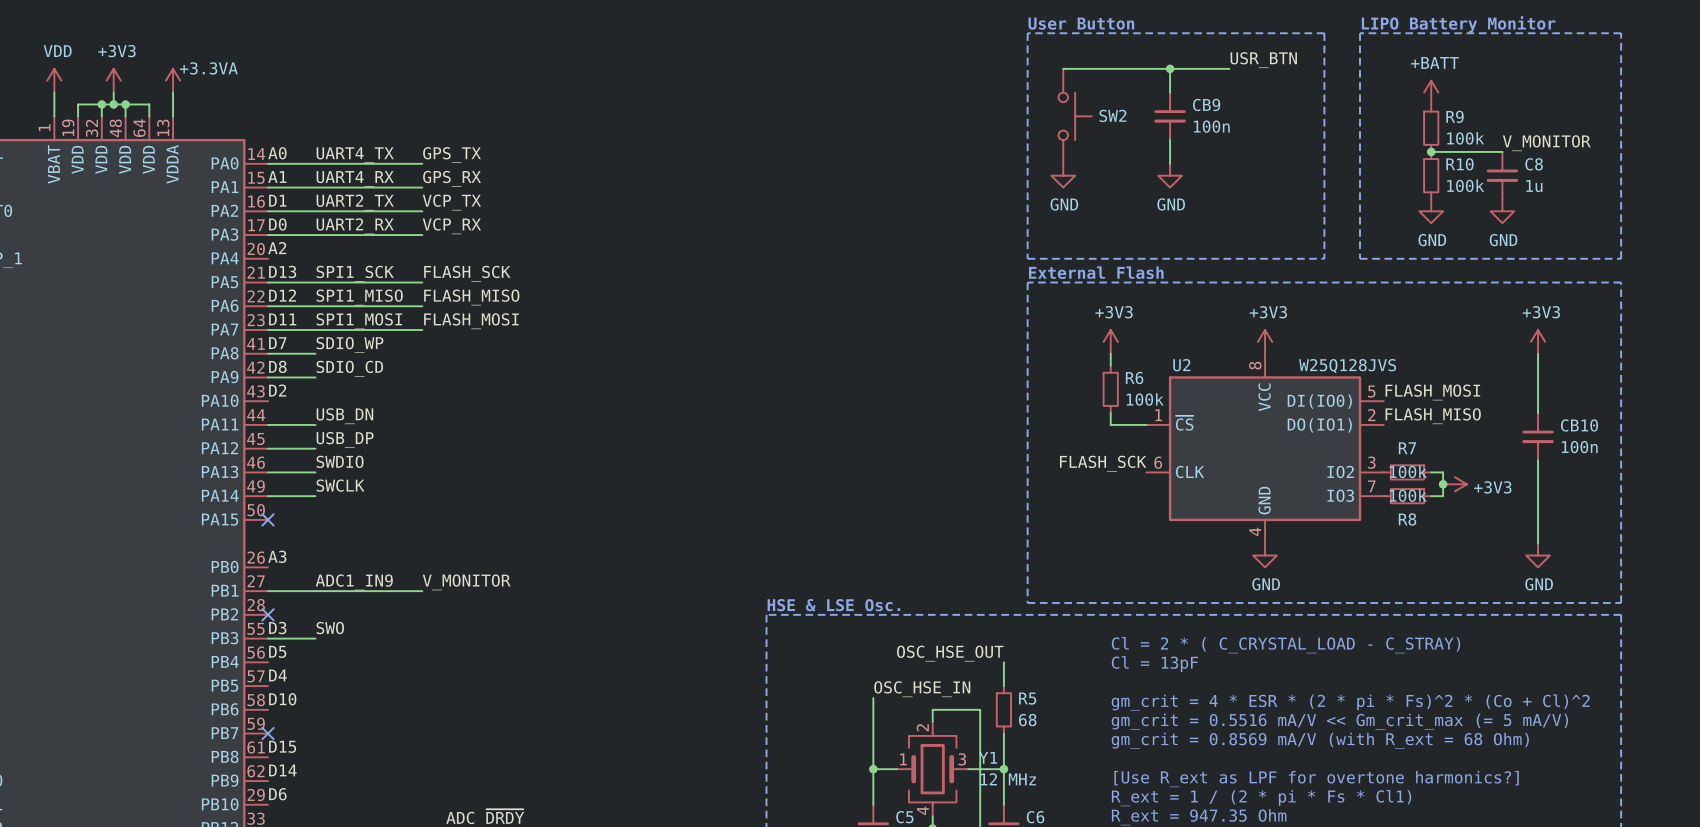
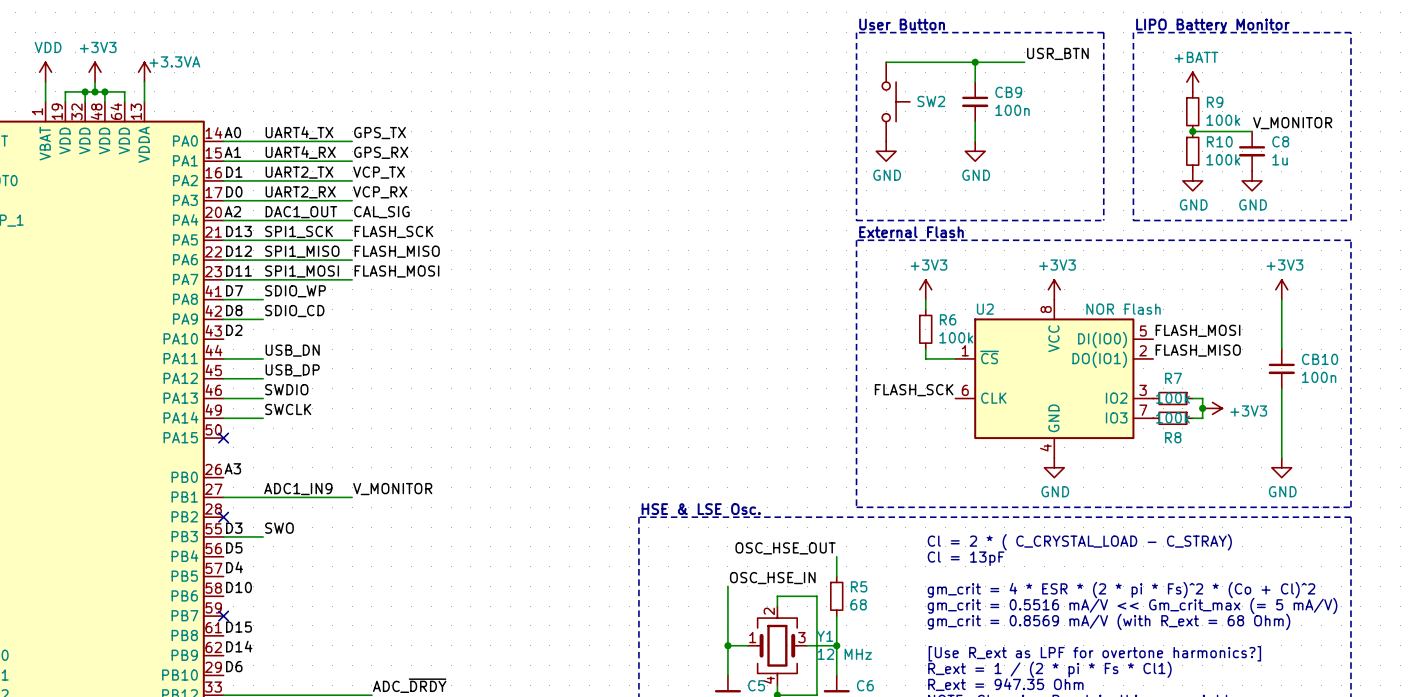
label: none -> DAC1_OUT (301, 212)
label: none -> CAL_SIG (381, 212)
wire: none -> (223, 220) (352, 220)
U2 value: W25Q128JVS (1347, 366) -> NOR Flash (1123, 309)

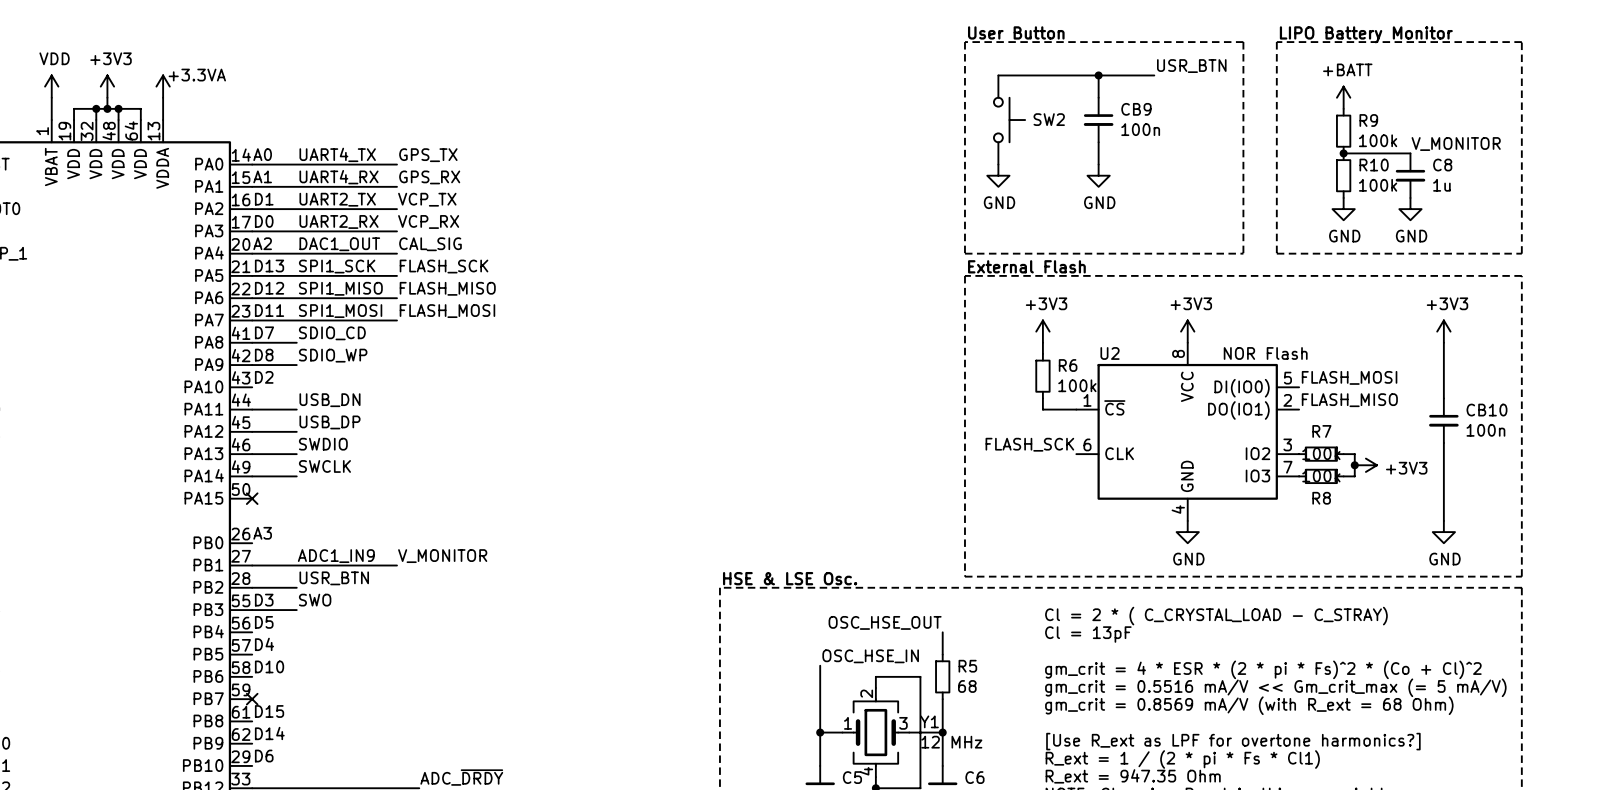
label: SDIO_WP (295, 291) -> SDIO_CD (332, 333)
label: SDIO_CD (294, 311) -> SDIO_WP (333, 355)
label: none -> USR_BTN (334, 578)
wire: none -> (252, 587) (296, 587)
no-connect mark: (223, 517) -> none

